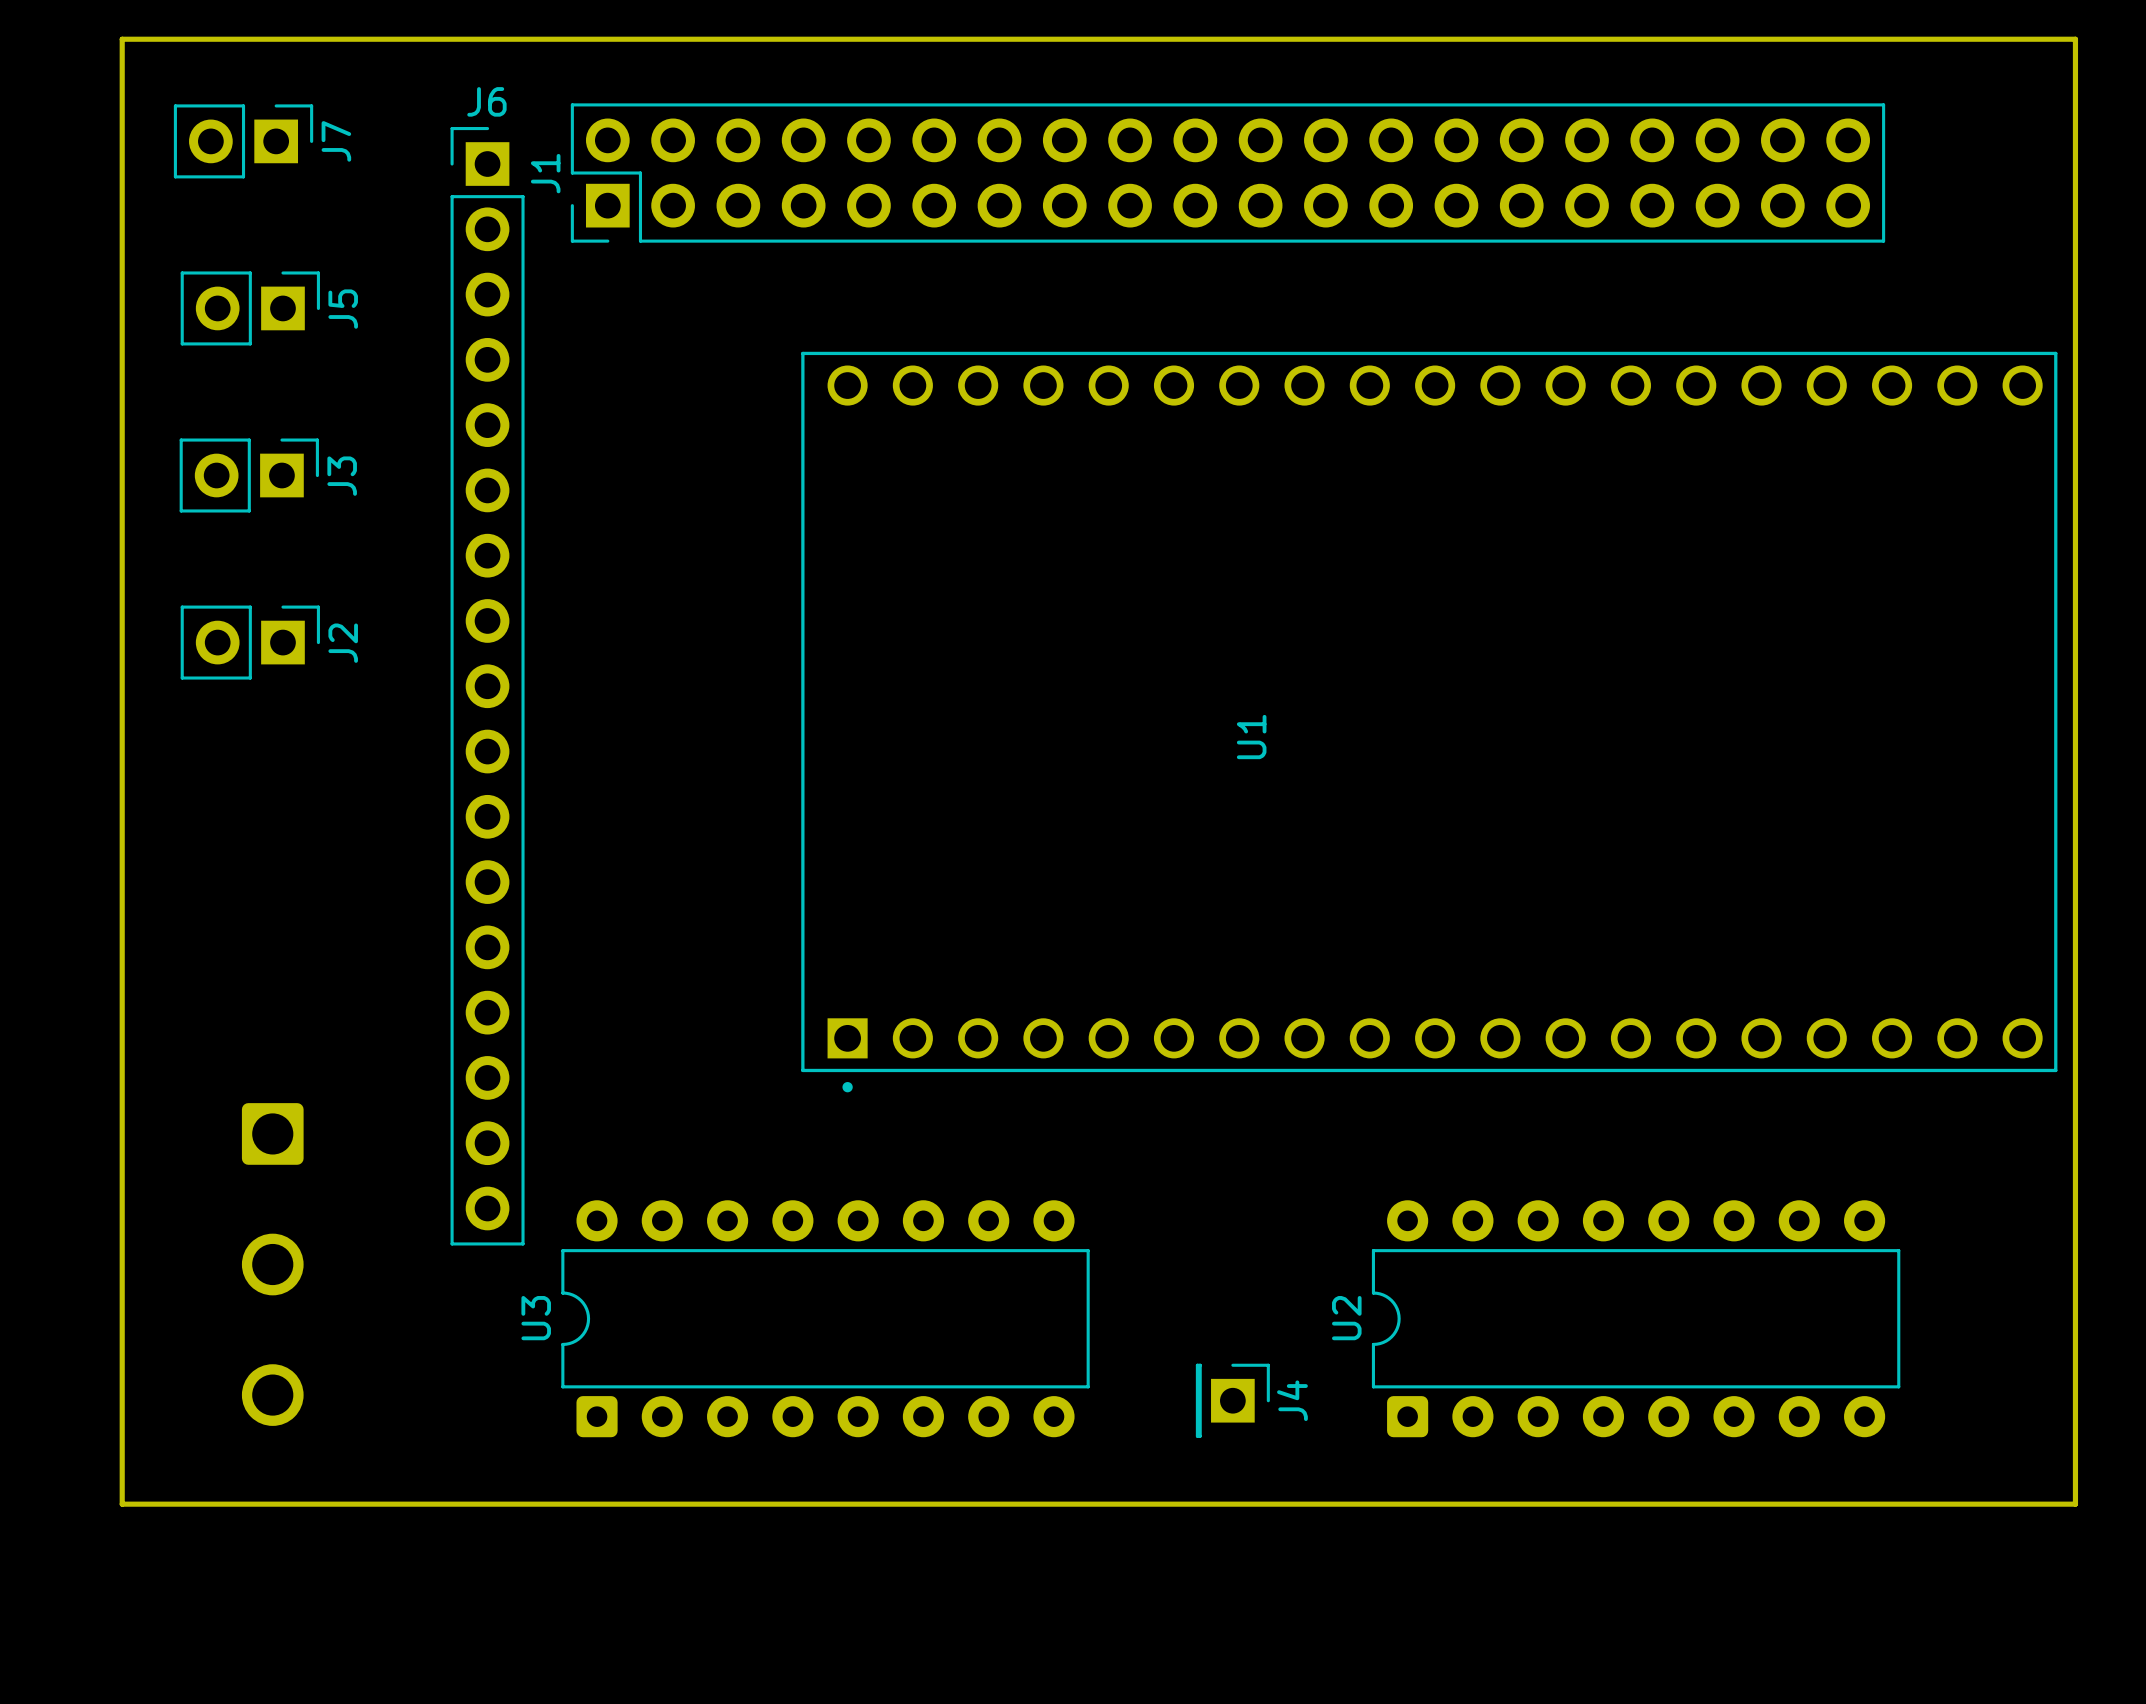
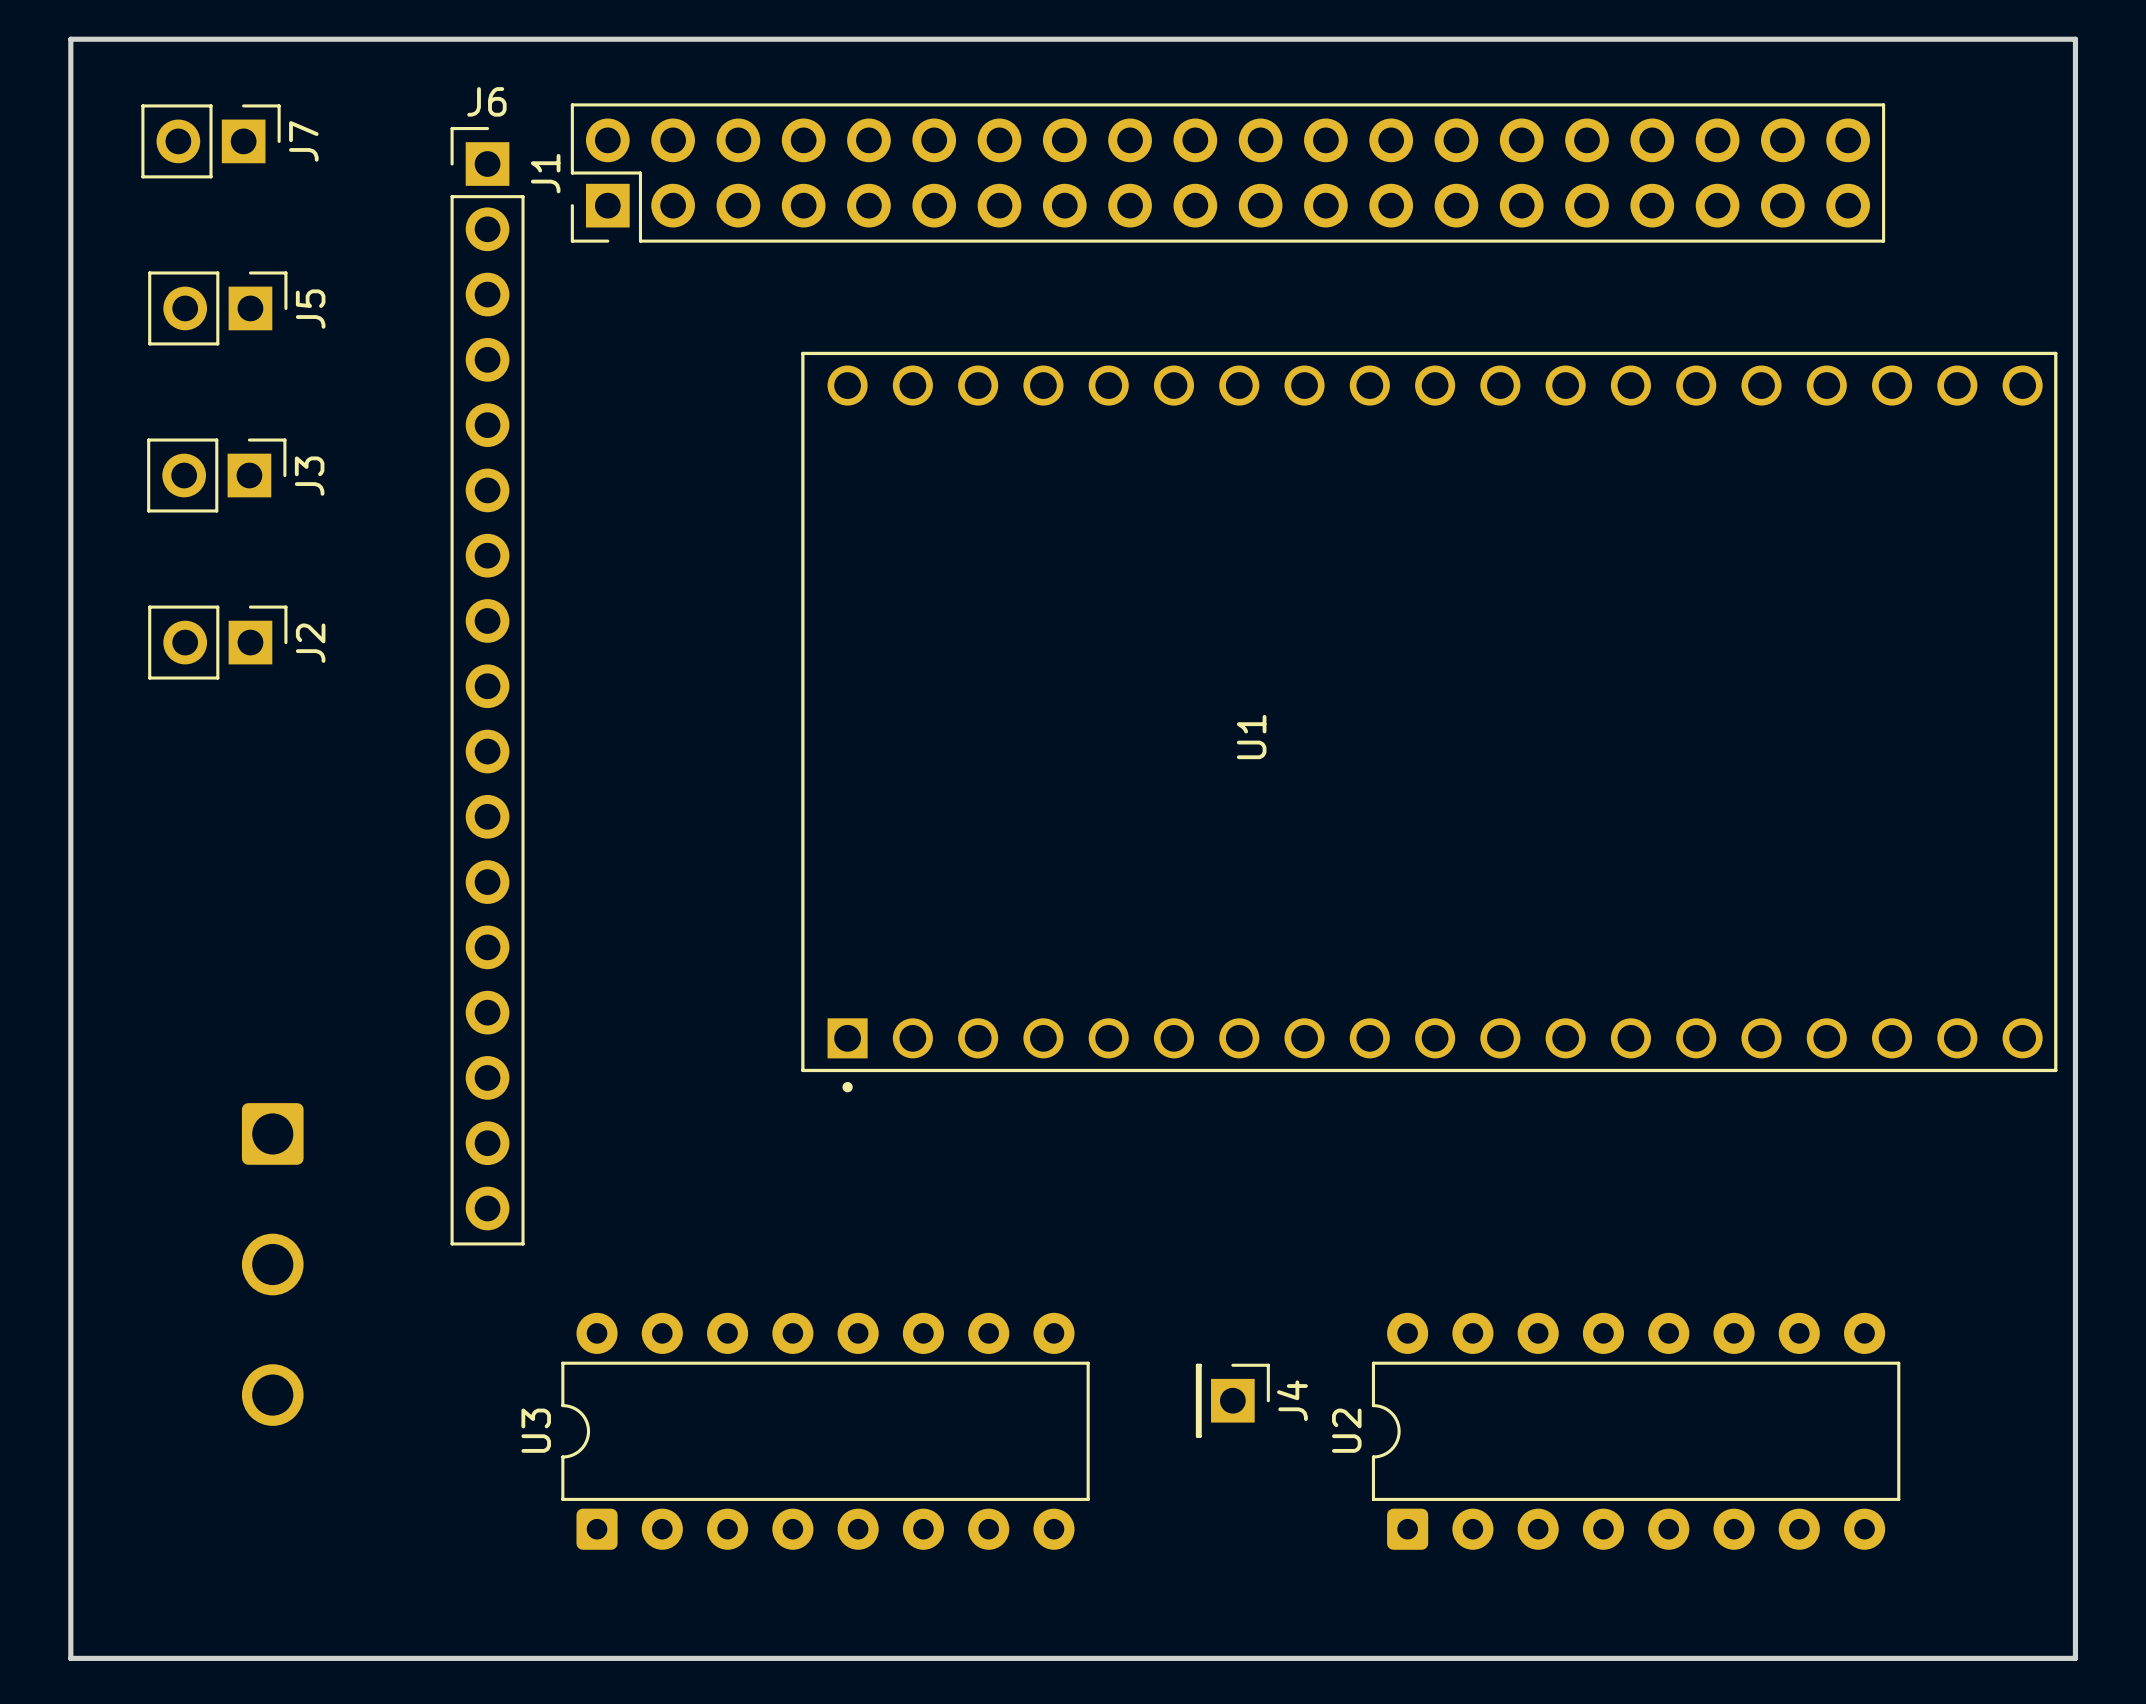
board edge: (122, 39) (122, 1504) (2075, 1504) -> (122, 39) (70, 39) (70, 1658) (2075, 1658) (2075, 1504)
J7 position: (243, 141) -> (211, 141)
J5 position: (250, 308) -> (217, 308)
J3 position: (249, 475) -> (216, 475)
J2 position: (250, 642) -> (217, 642)
U3 position: (825, 1318) -> (825, 1431)
U2 position: (1636, 1318) -> (1636, 1431)

